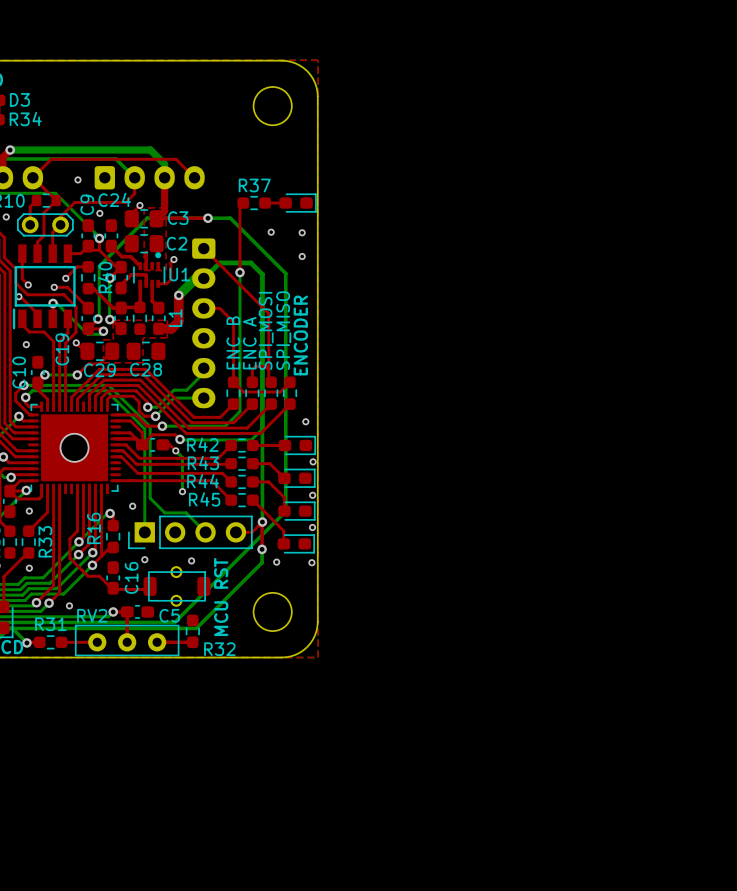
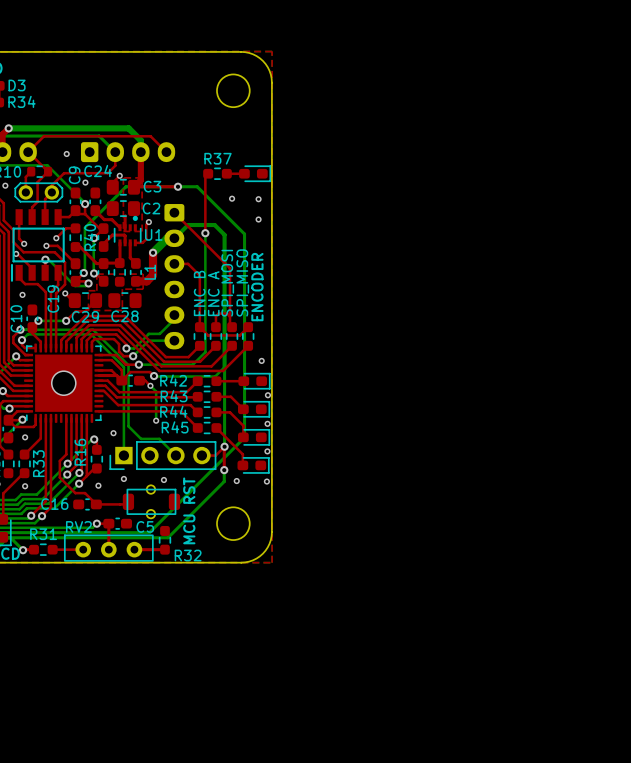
C16 rotation: 0° (113, 577) -> 90° clockwise (87, 504)
C16 name position: C16 (131, 577) -> C16 (54, 504)
via position: (69, 605) -> (98, 485)

